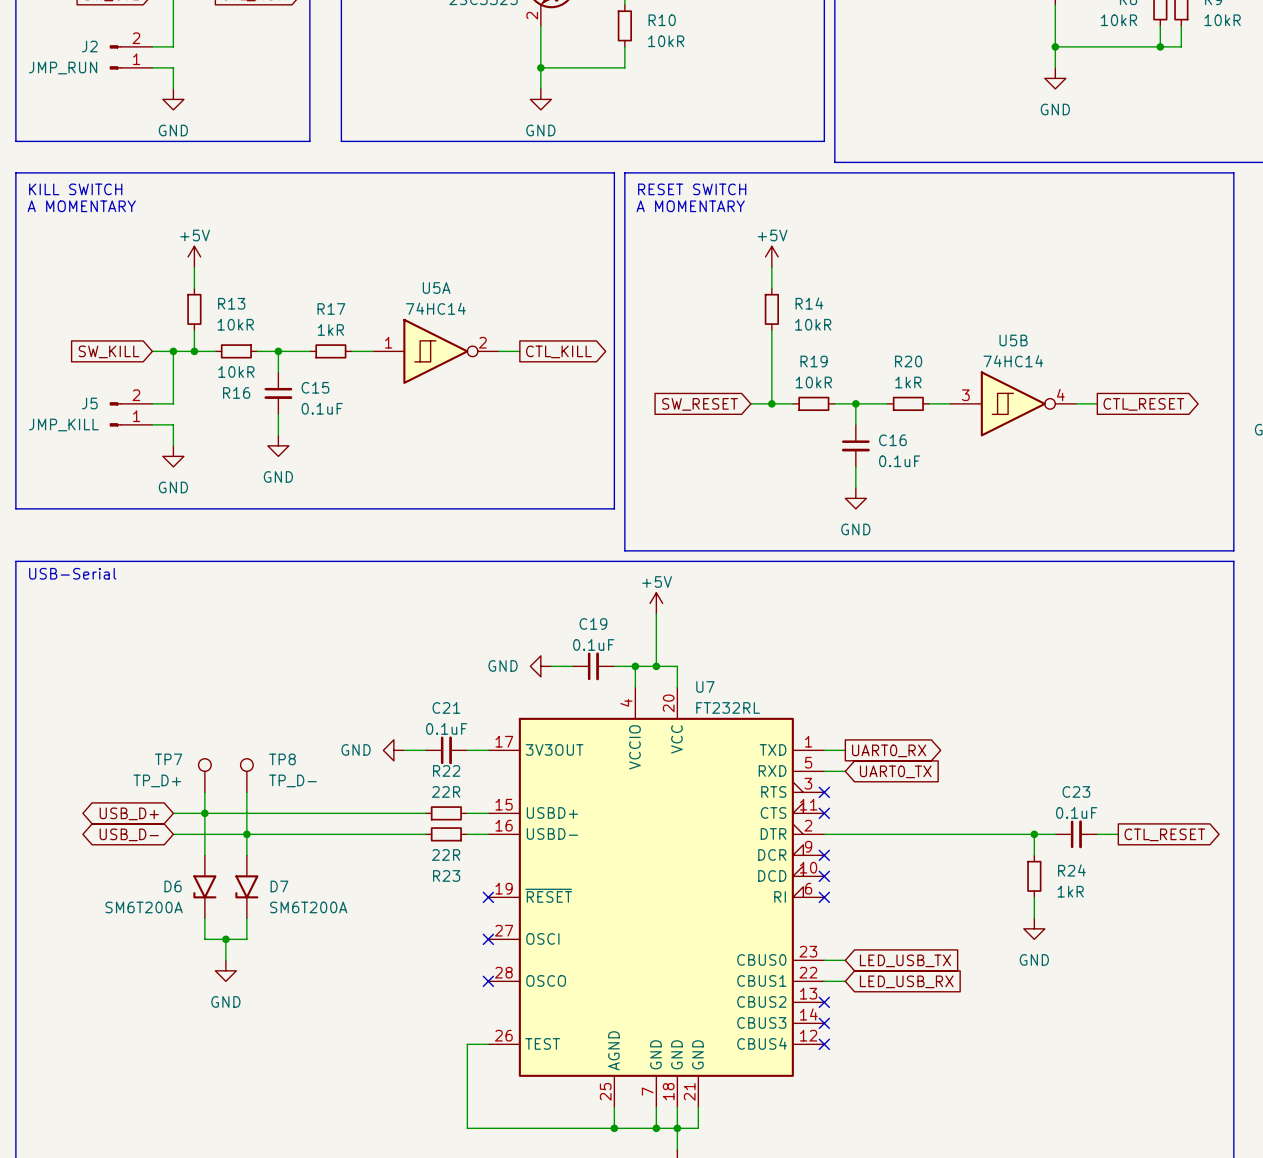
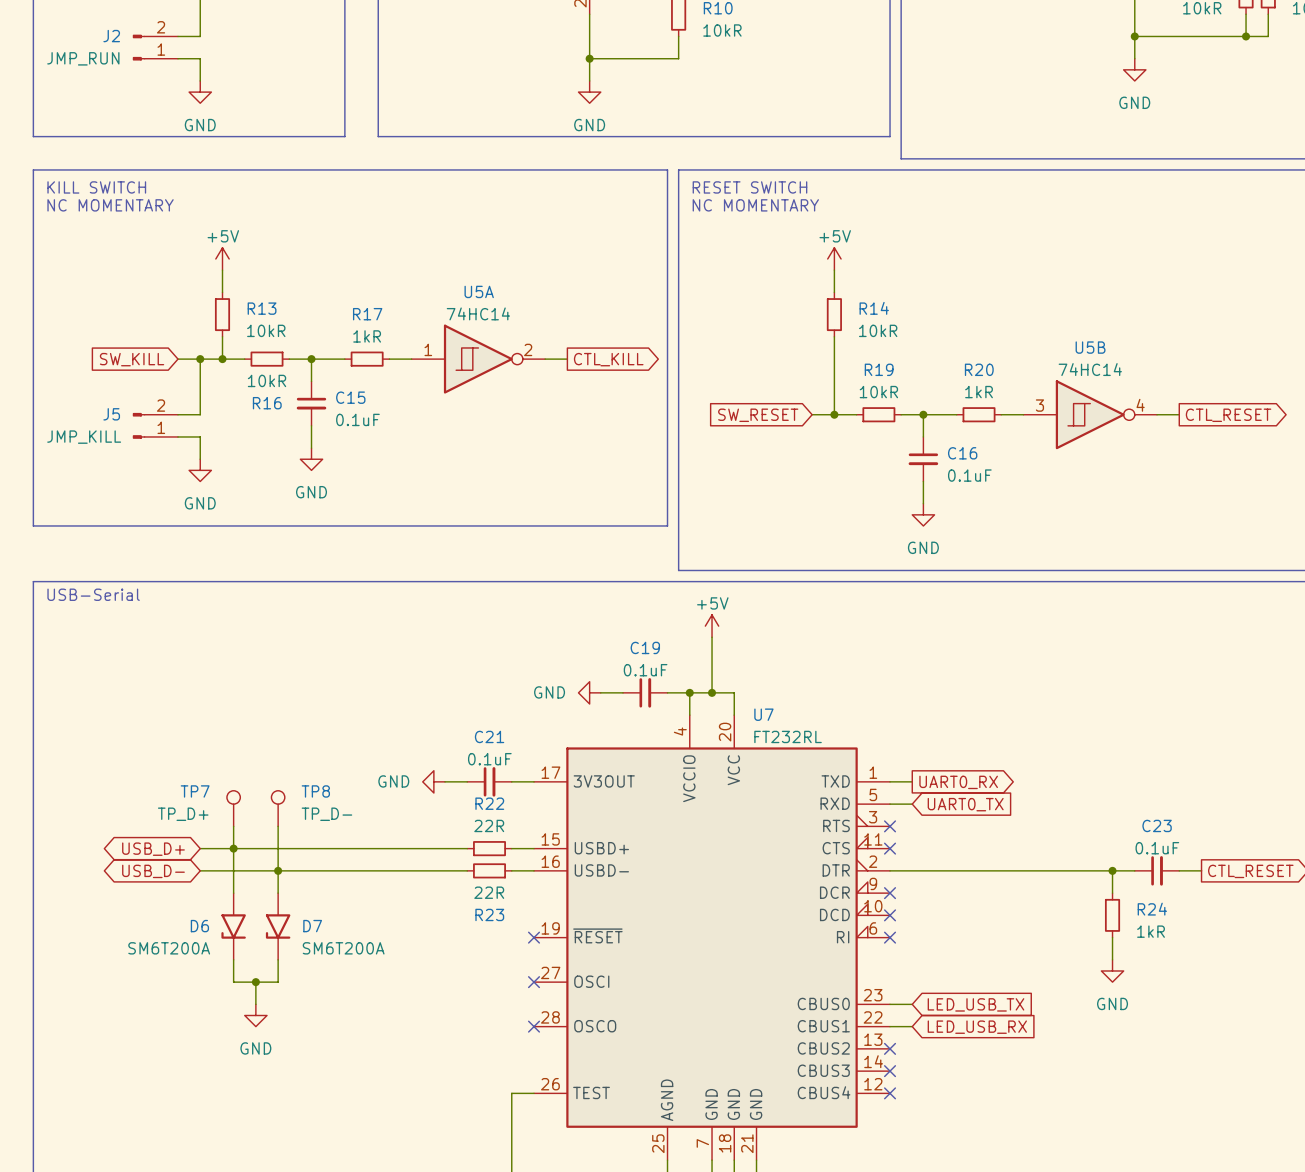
text: A MOMENTARY (81, 206) -> NC MOMENTARY (110, 205)
text: A MOMENTARY (690, 206) -> NC MOMENTARY (755, 205)

